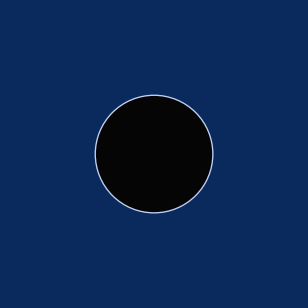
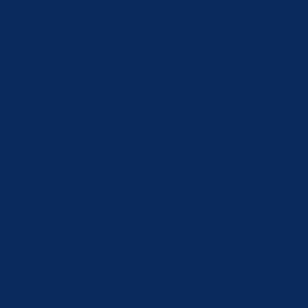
part: (154, 154) -> none

